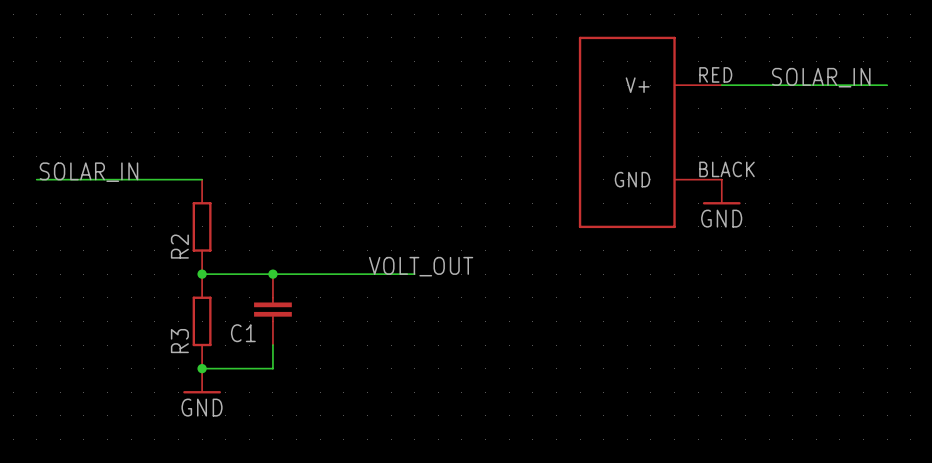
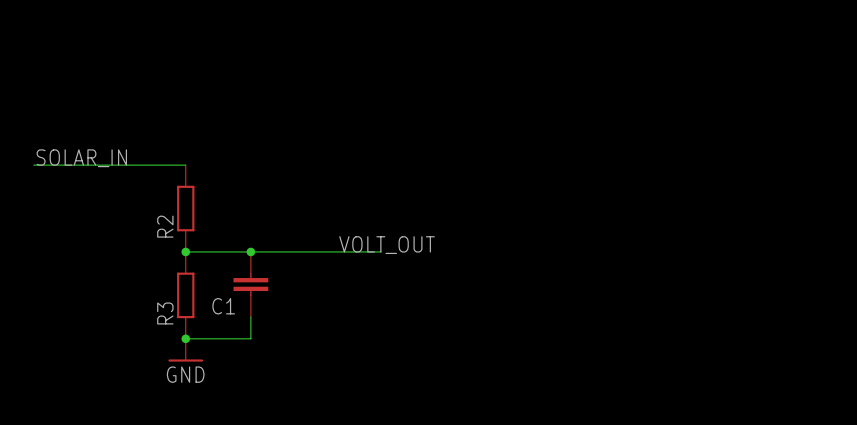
label: SOLAR_IN (821, 77) -> none
wire: (721, 85) (887, 85) -> none
part: (650, 132) -> none
power symbol: GND (721, 192) -> none

